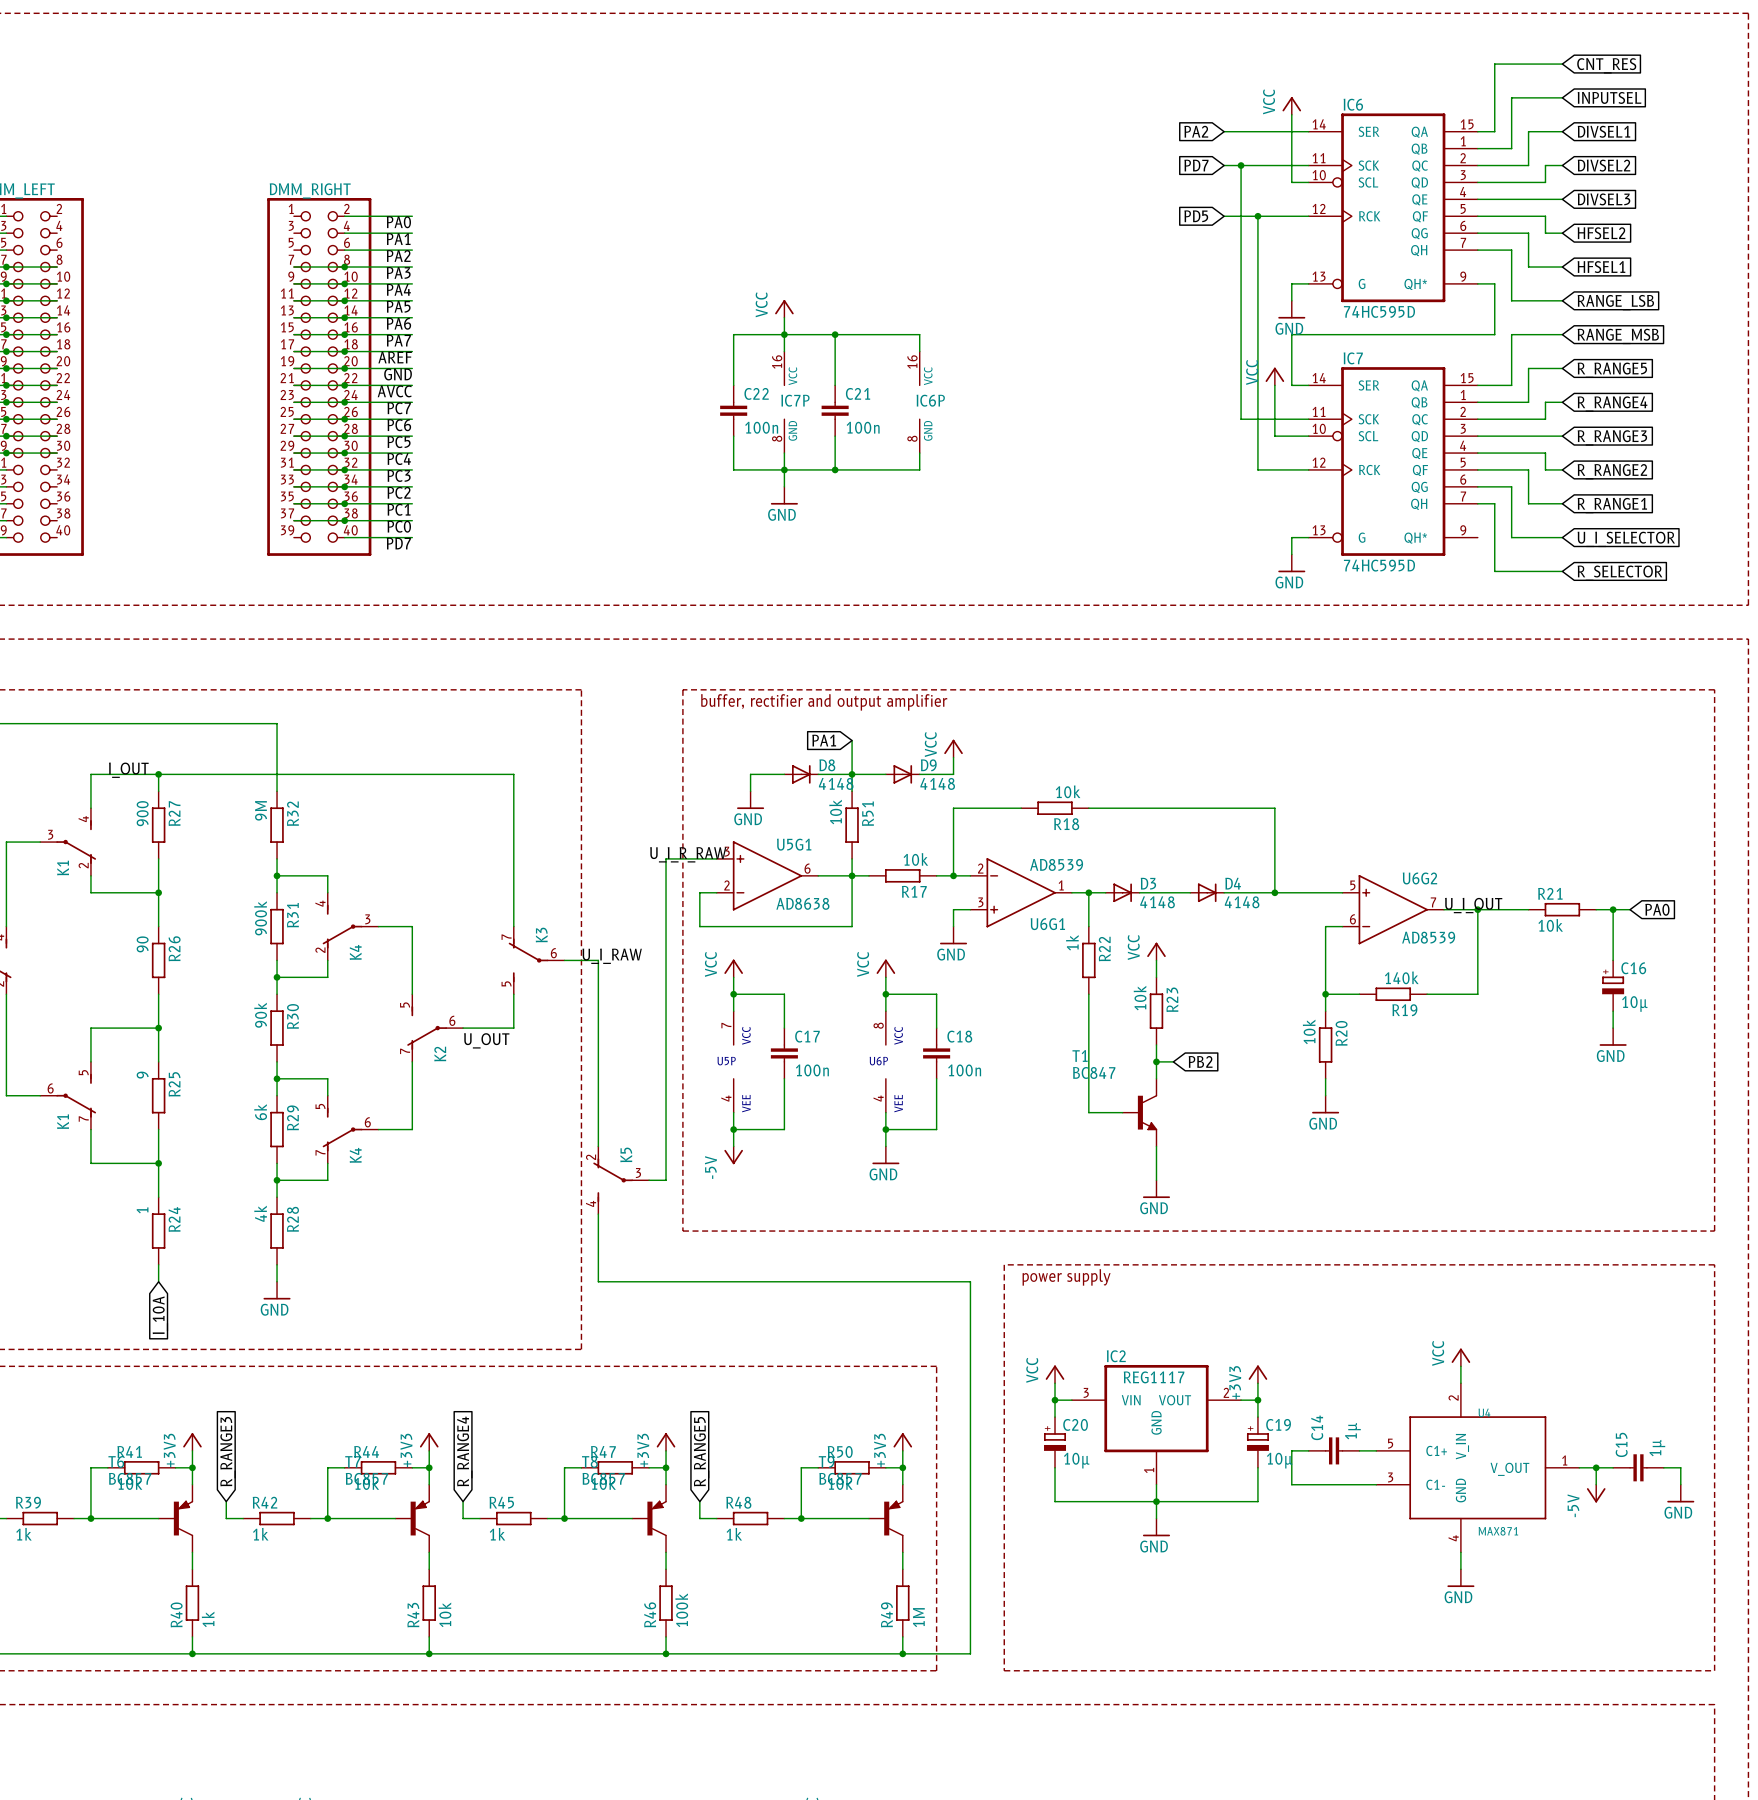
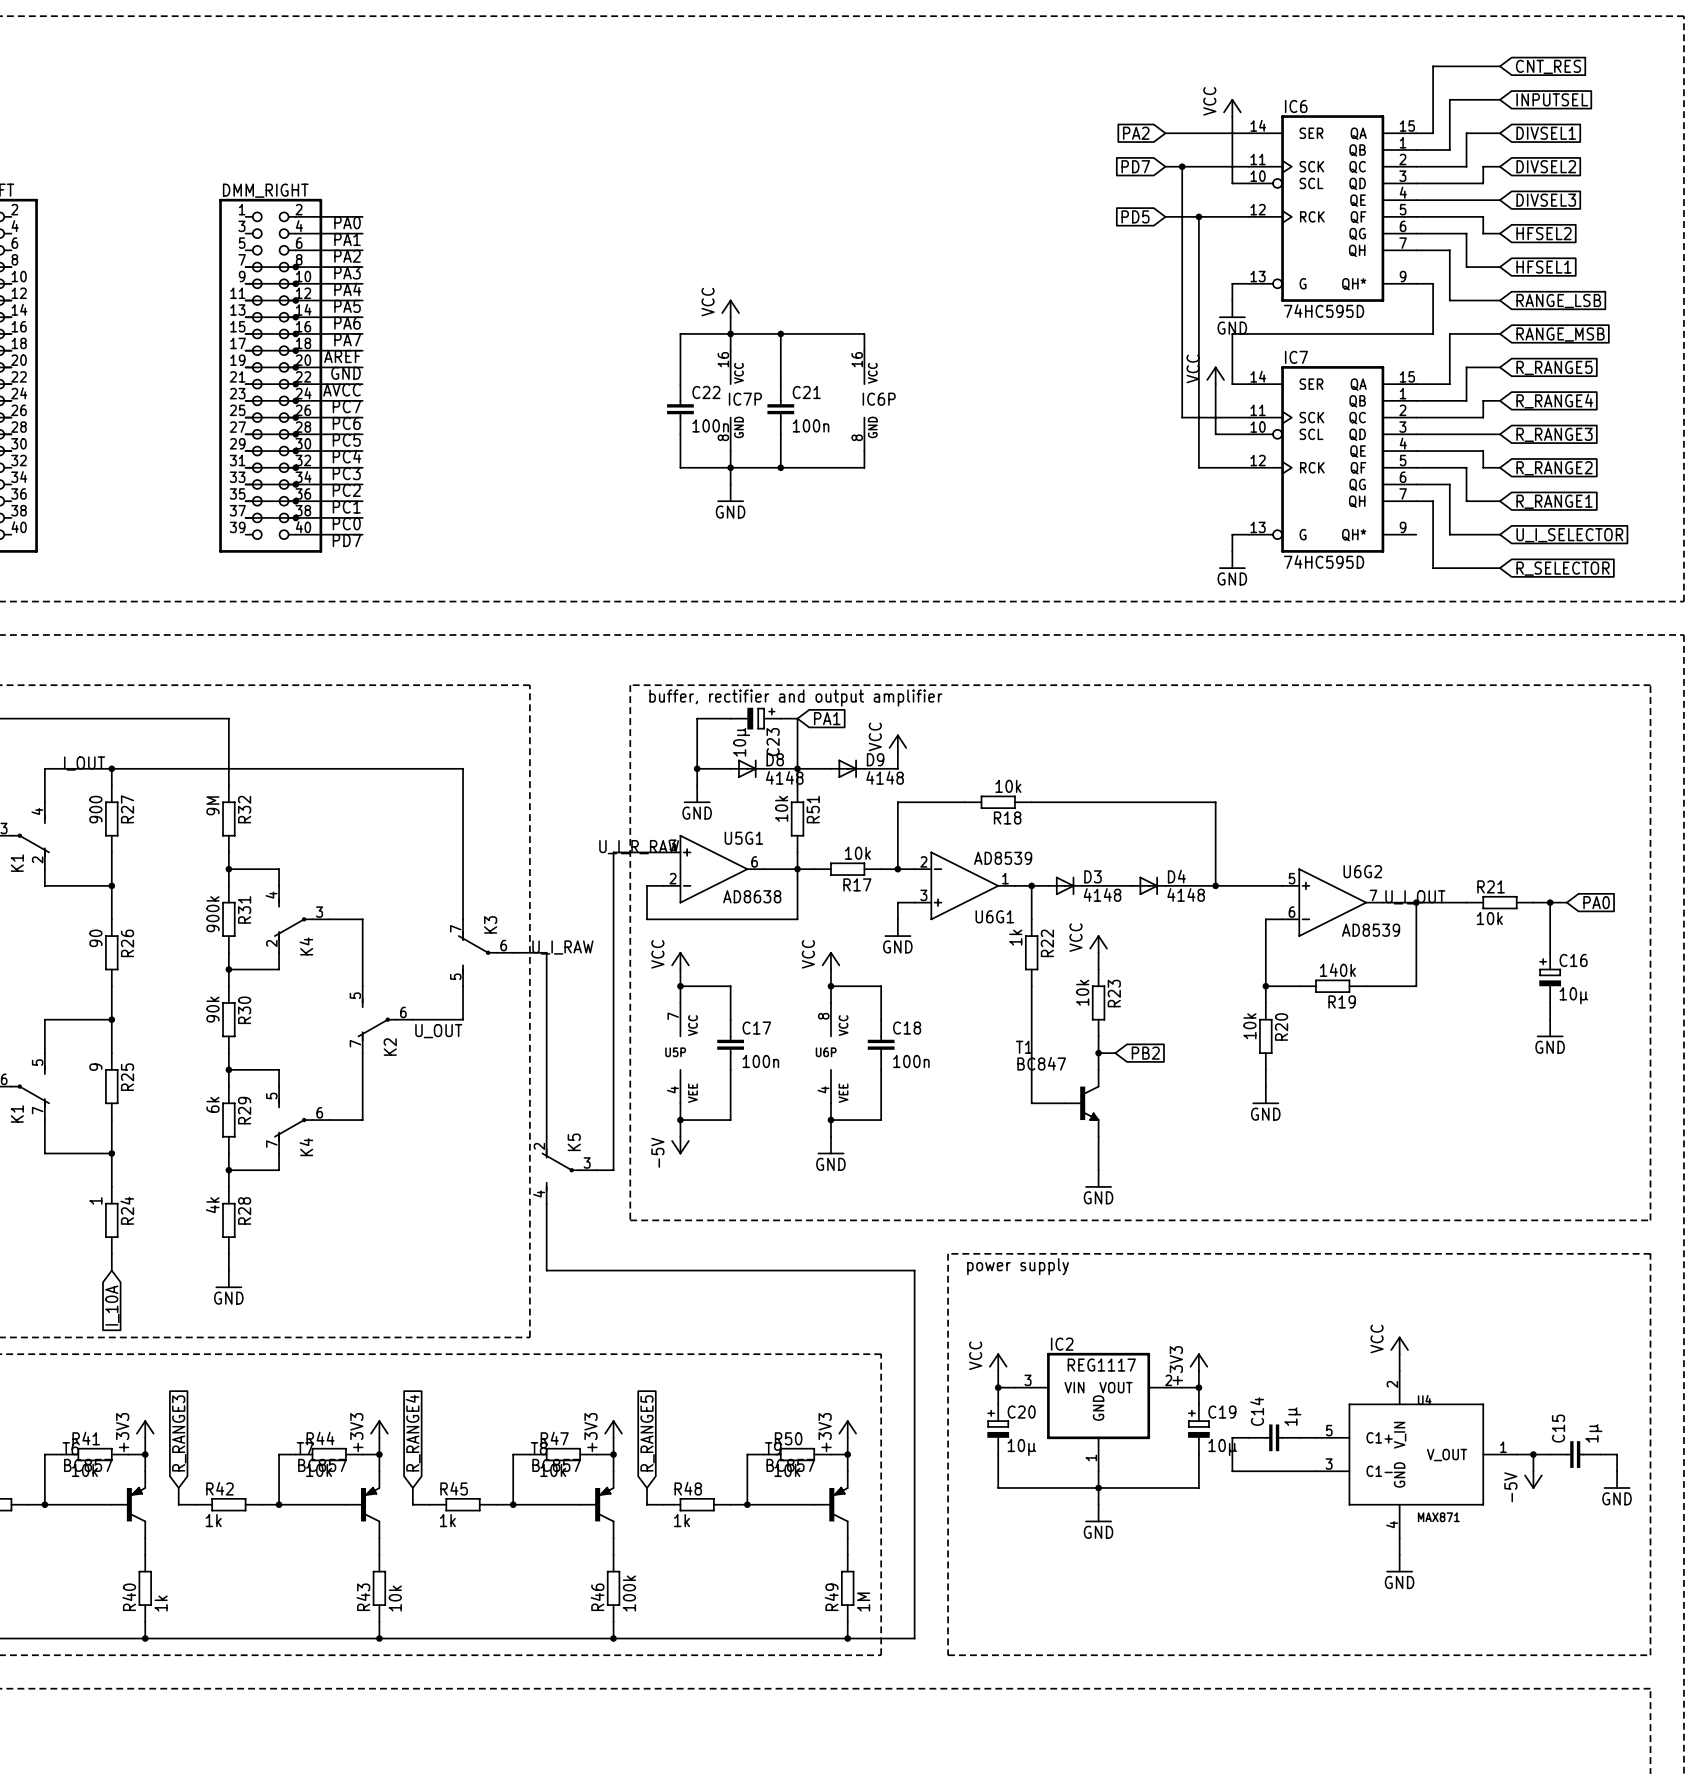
wire: none -> (730, 718) (697, 718) (697, 768)
C23: none -> 10µ (755, 718)
wire: none -> (780, 718) (797, 718) (797, 735)
global label rotation: 0° (824, 740) -> 180° (827, 718)
global label position: PA1 (824, 740) -> PA1 (827, 718)
junction: none -> (697, 768)

